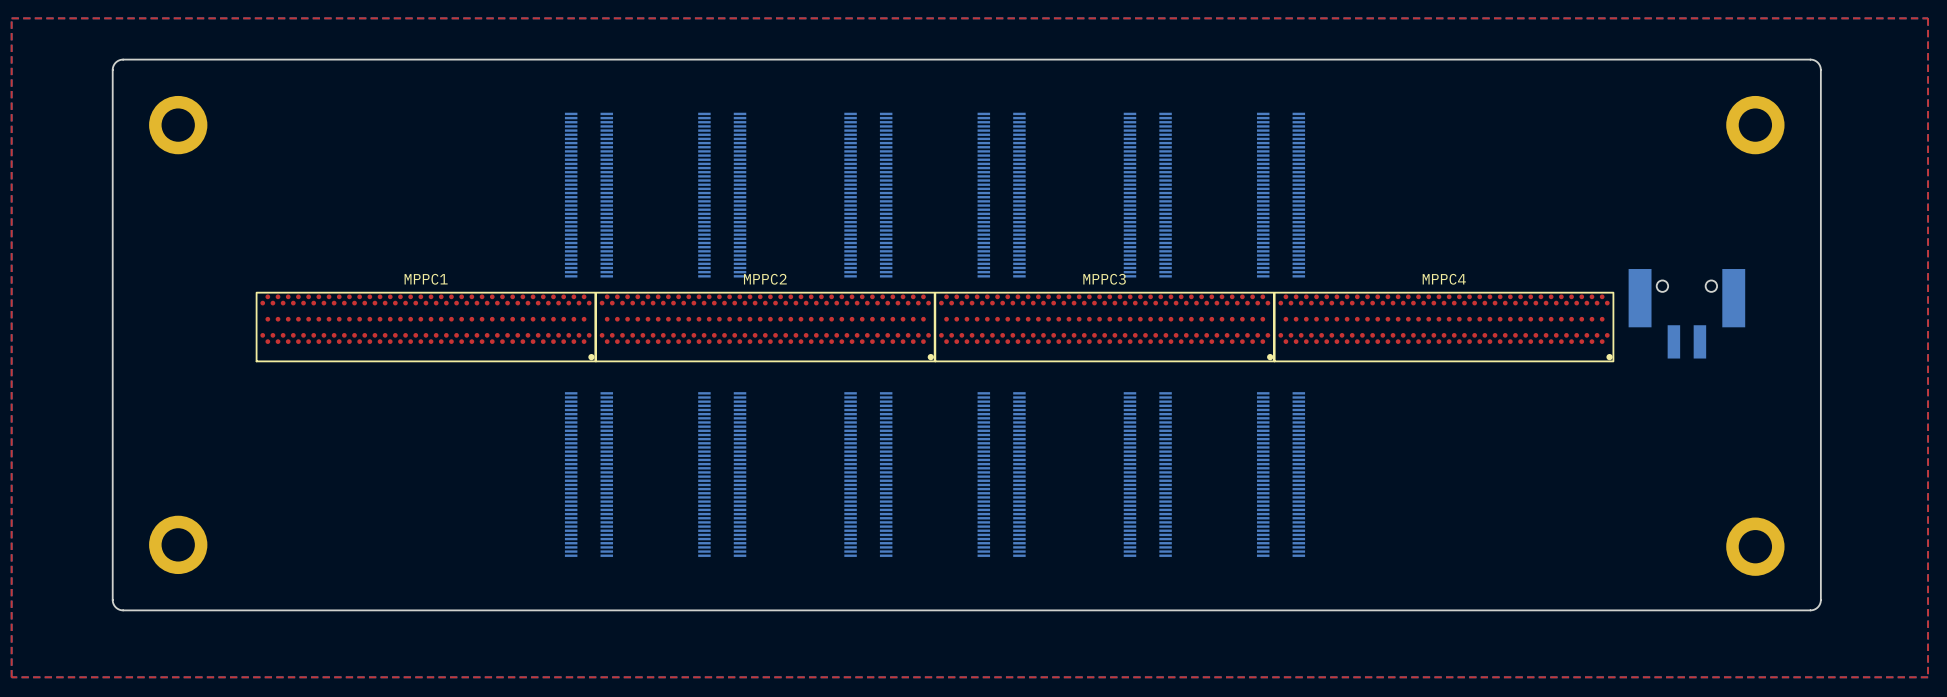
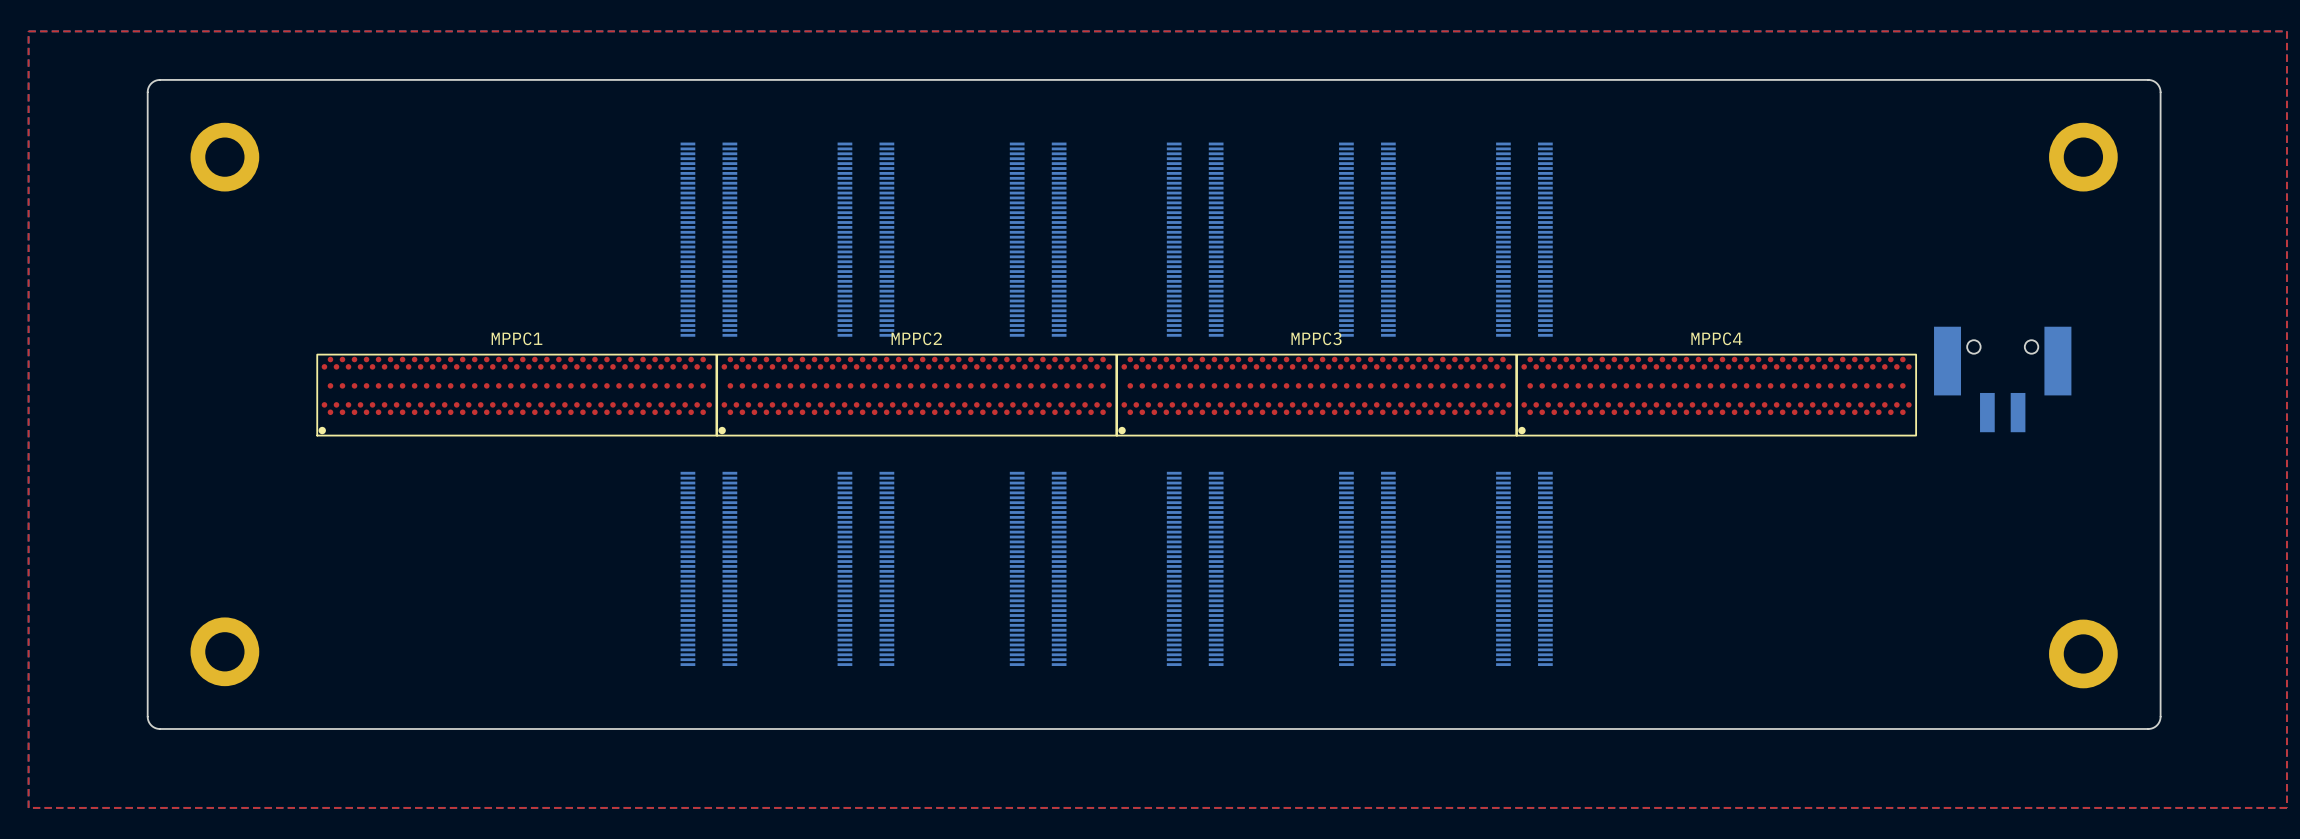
MPPC1 footprint: [256, 292, 596, 362] -> [316, 353, 718, 437]
MPPC2 footprint: [595, 292, 936, 362] -> [716, 353, 1117, 437]
MPPC3 footprint: [934, 292, 1275, 362] -> [1116, 353, 1517, 437]
MPPC4 footprint: [1274, 292, 1614, 362] -> [1516, 353, 1917, 437]

